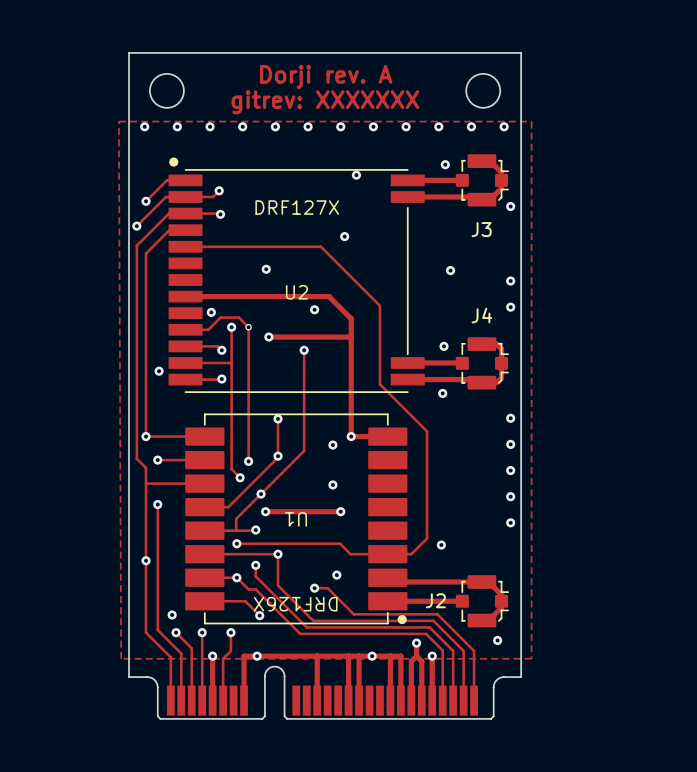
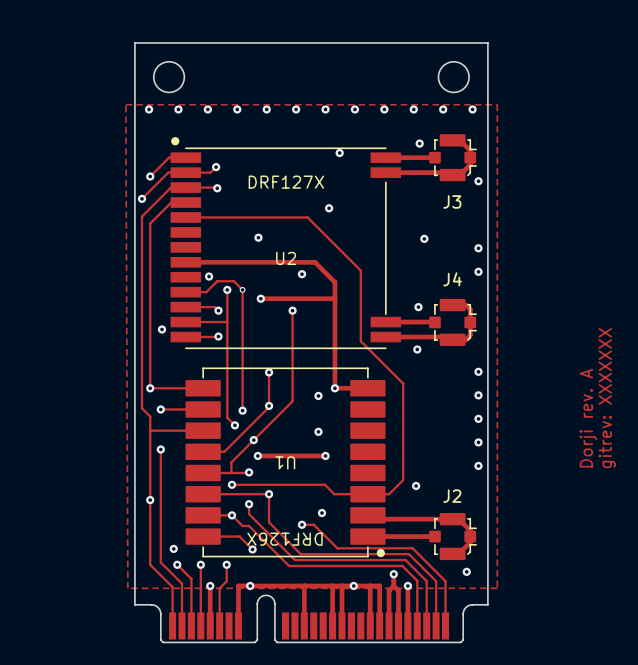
text: Dorji rev. A (326, 76) -> none
text: gitrev: XXXXXXX (325, 102) -> none
text: none -> gitrev: XXXXXXX (607, 398)
text: none -> Dorji rev. A (588, 418)
J2 name position: J2 (435, 600) -> J2 (452, 496)

